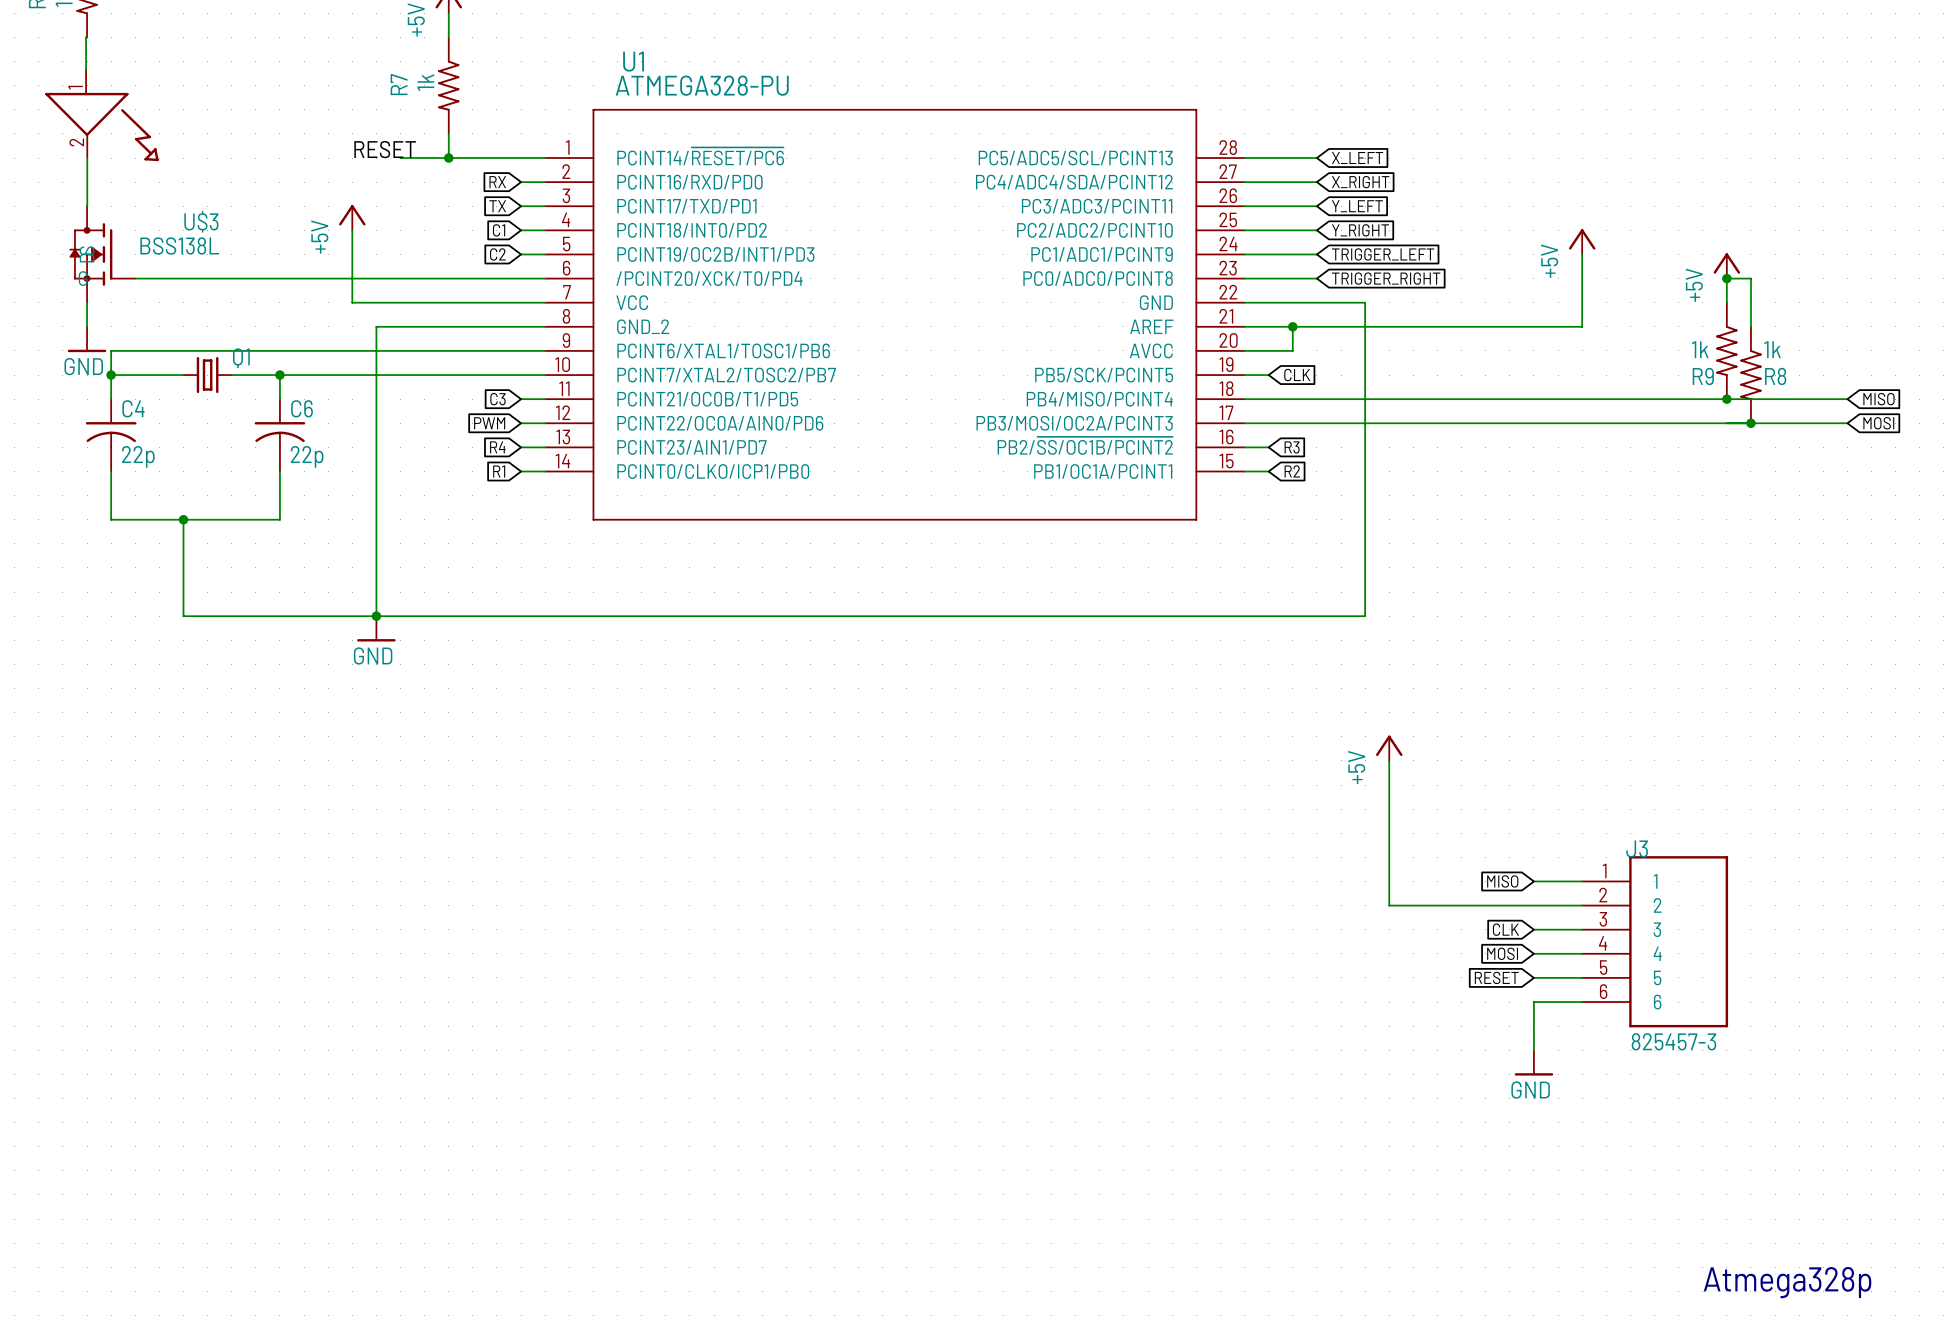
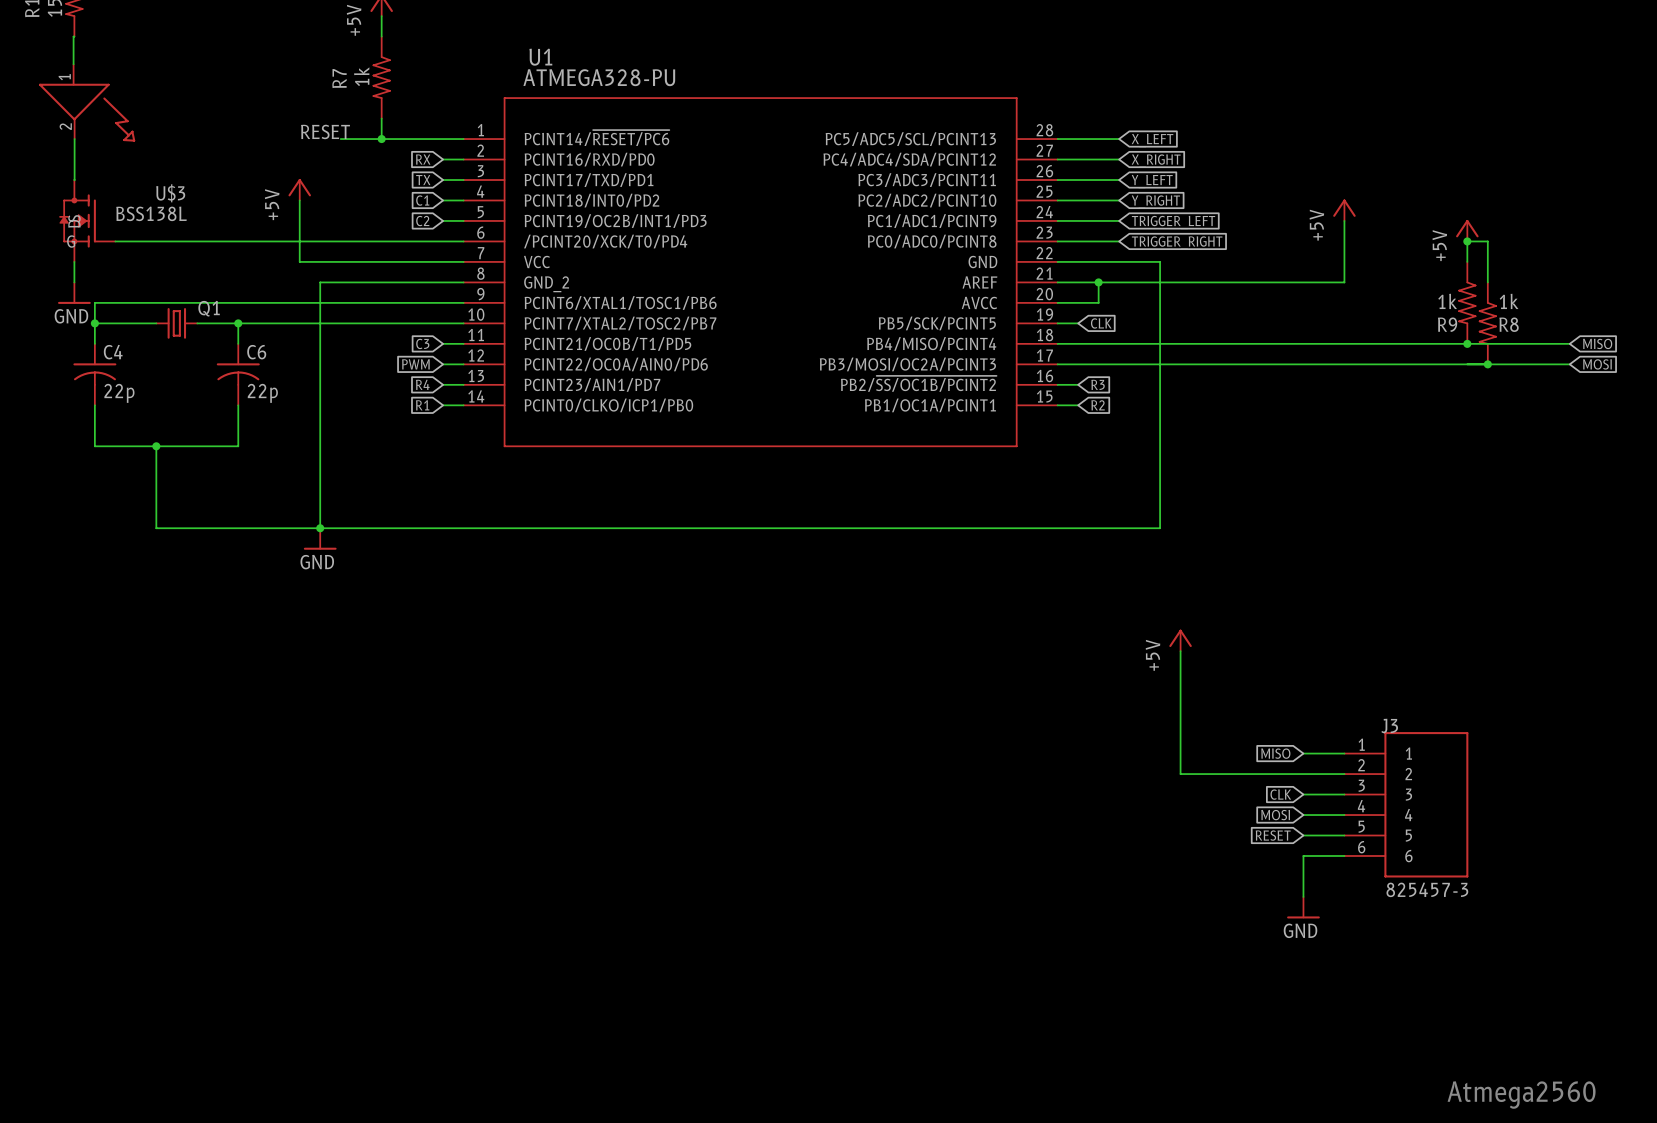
text: Atmega328p (1787, 1282) -> Atmega2560 (1521, 1095)

